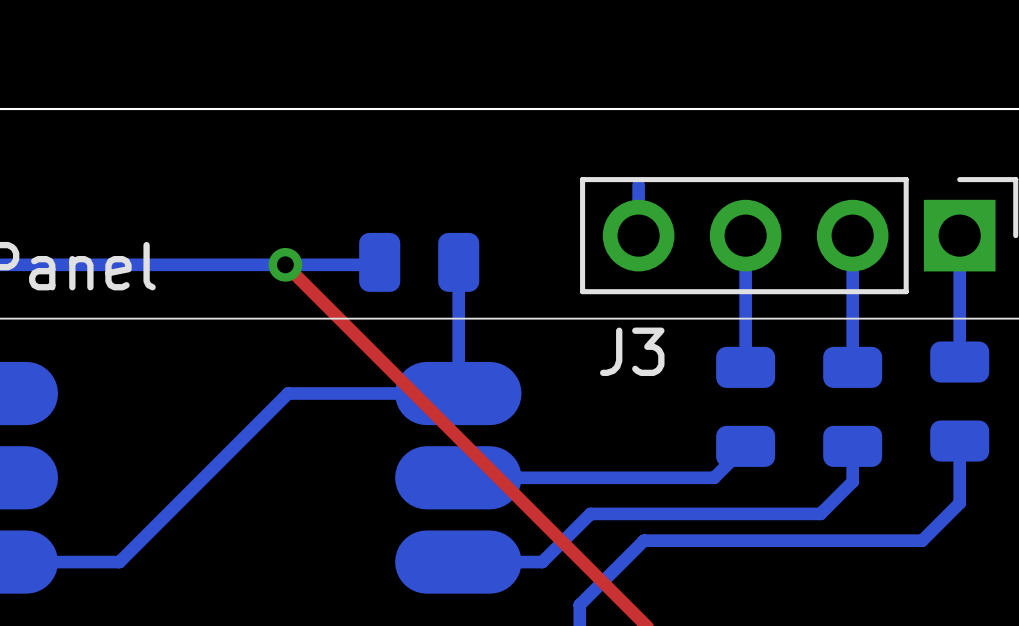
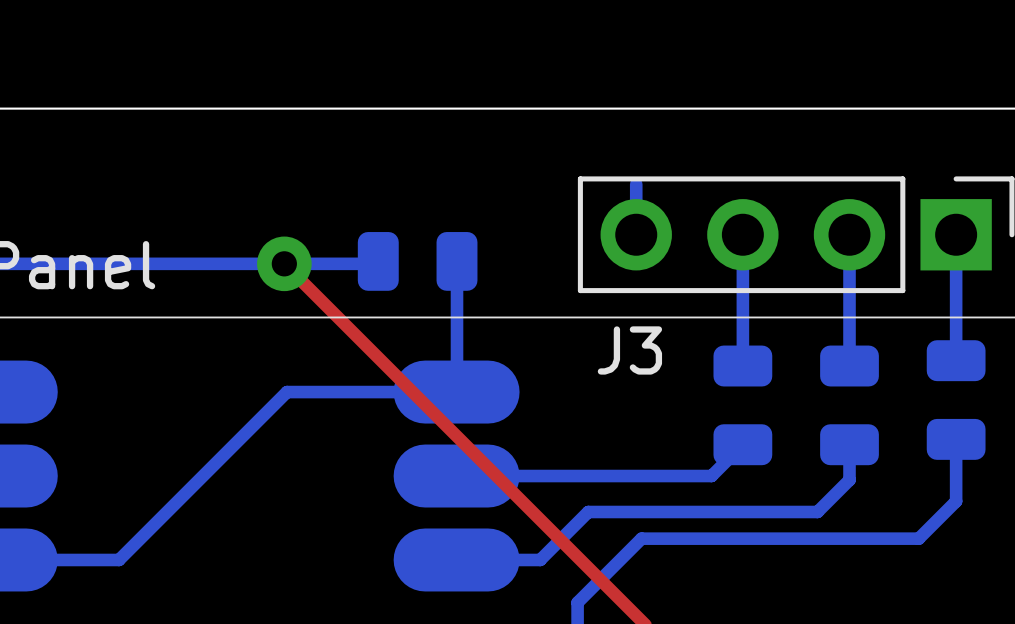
via size: [268, 247, 303, 282] -> [257, 236, 312, 292]

